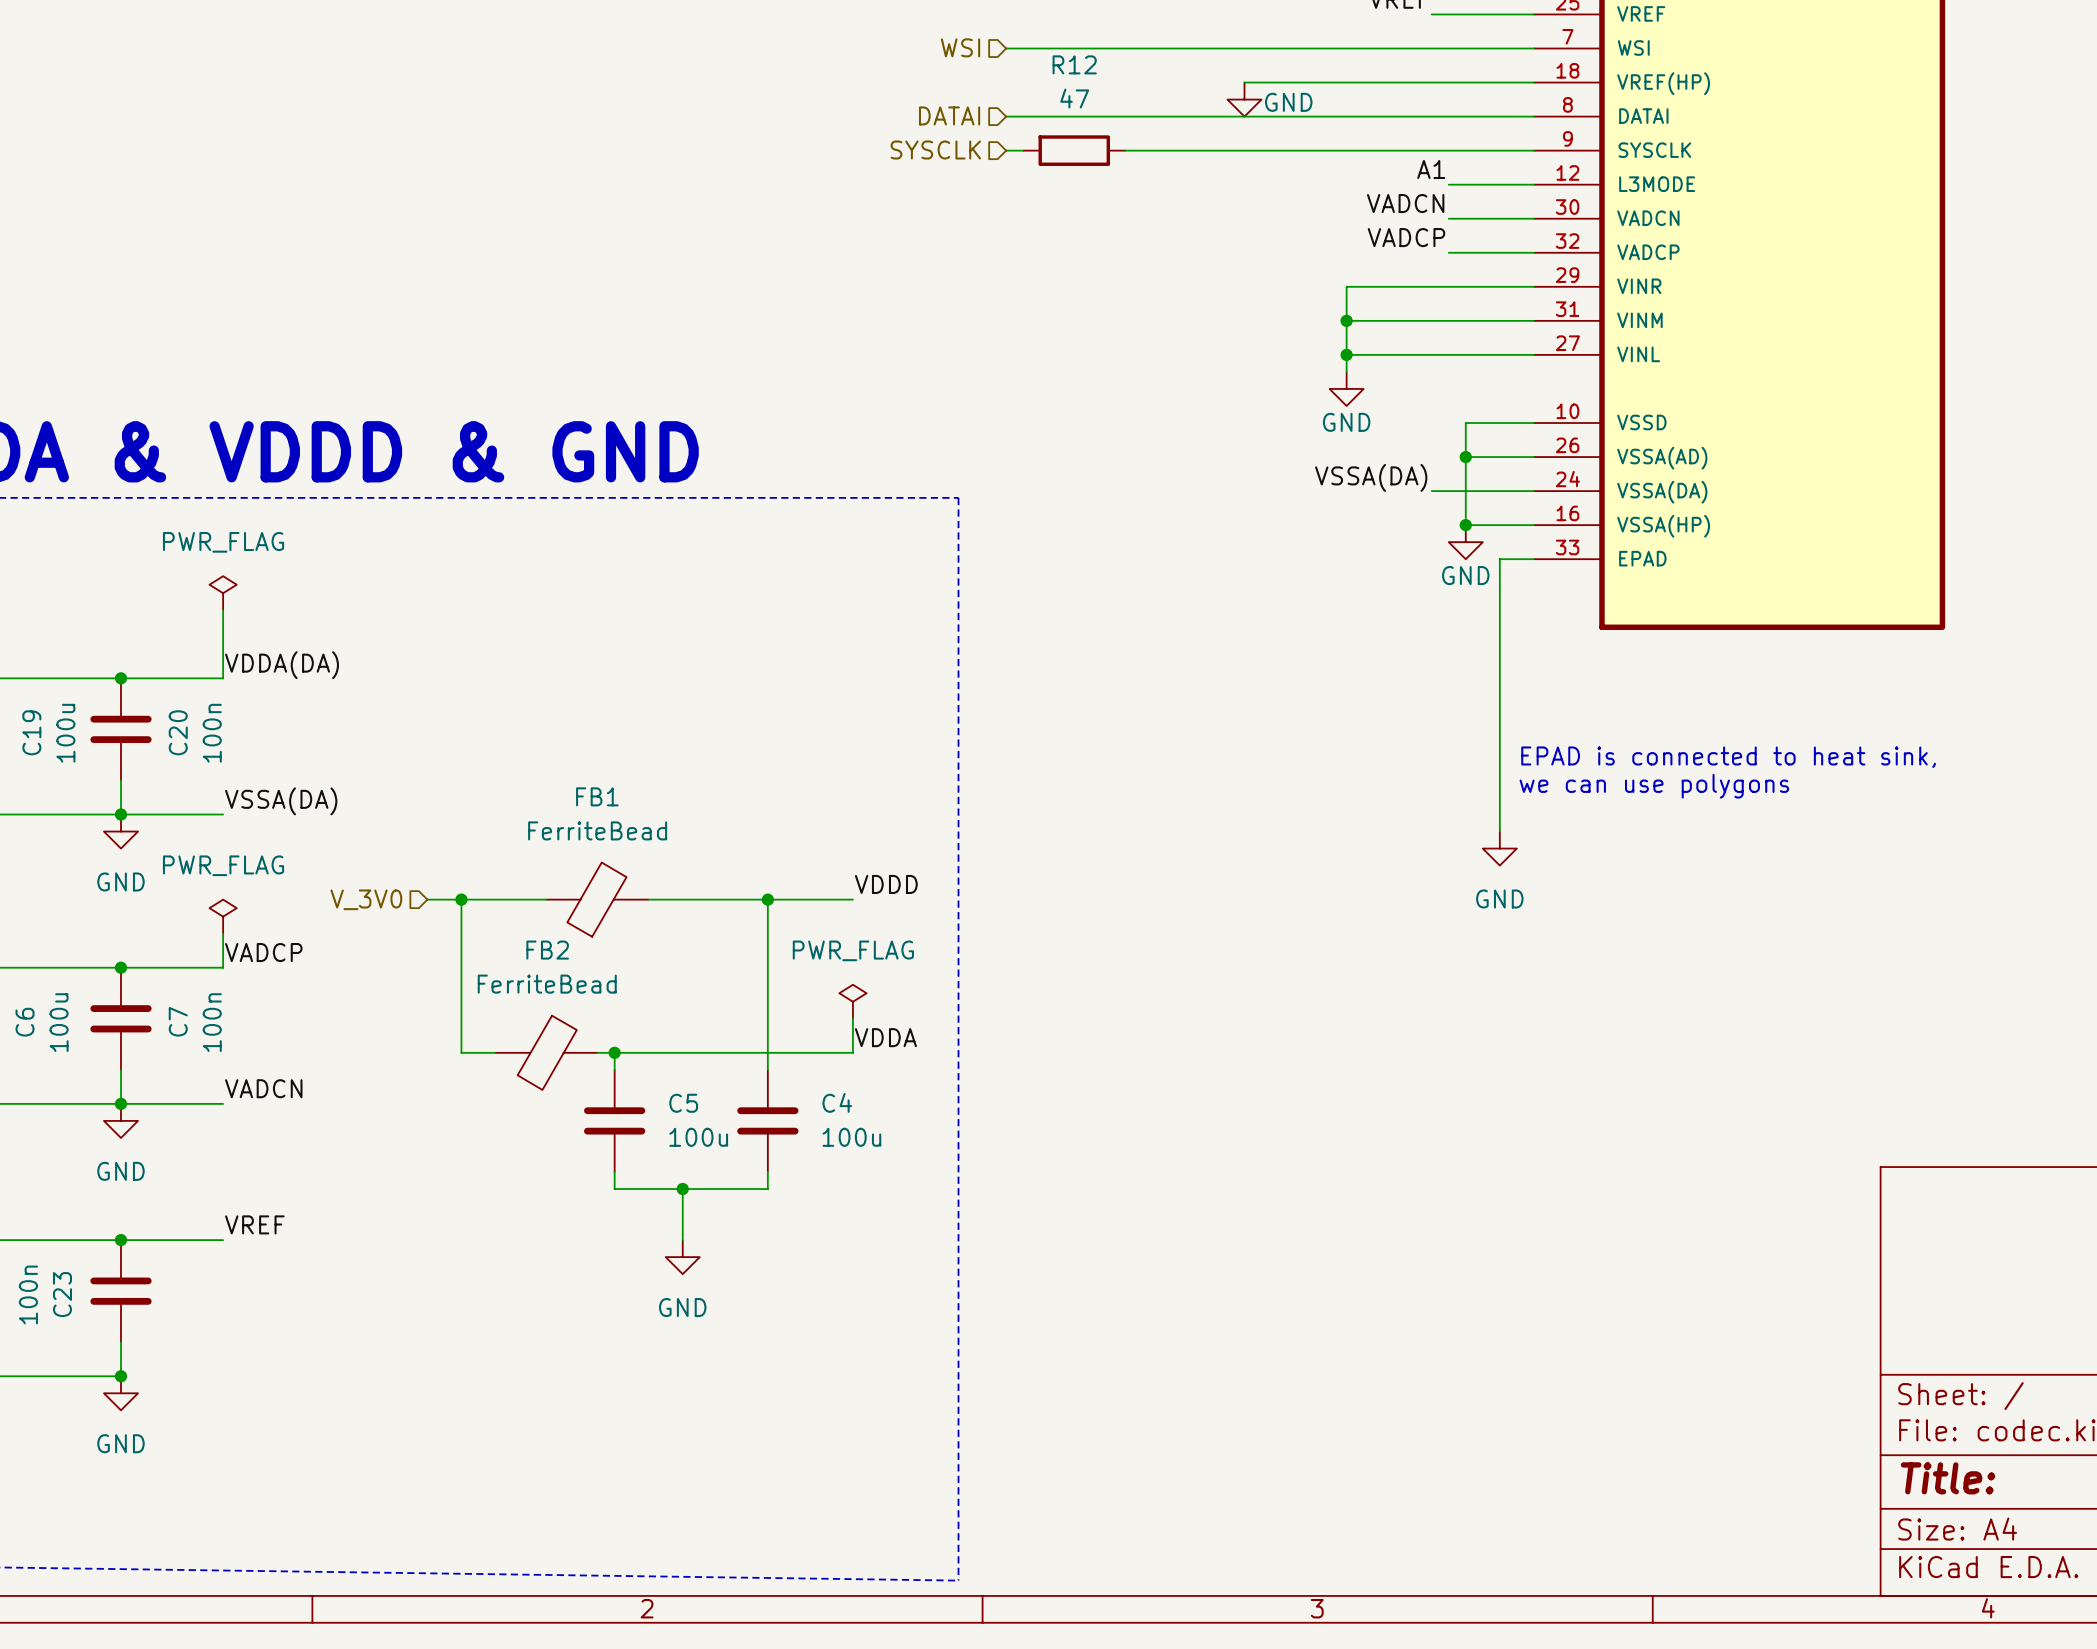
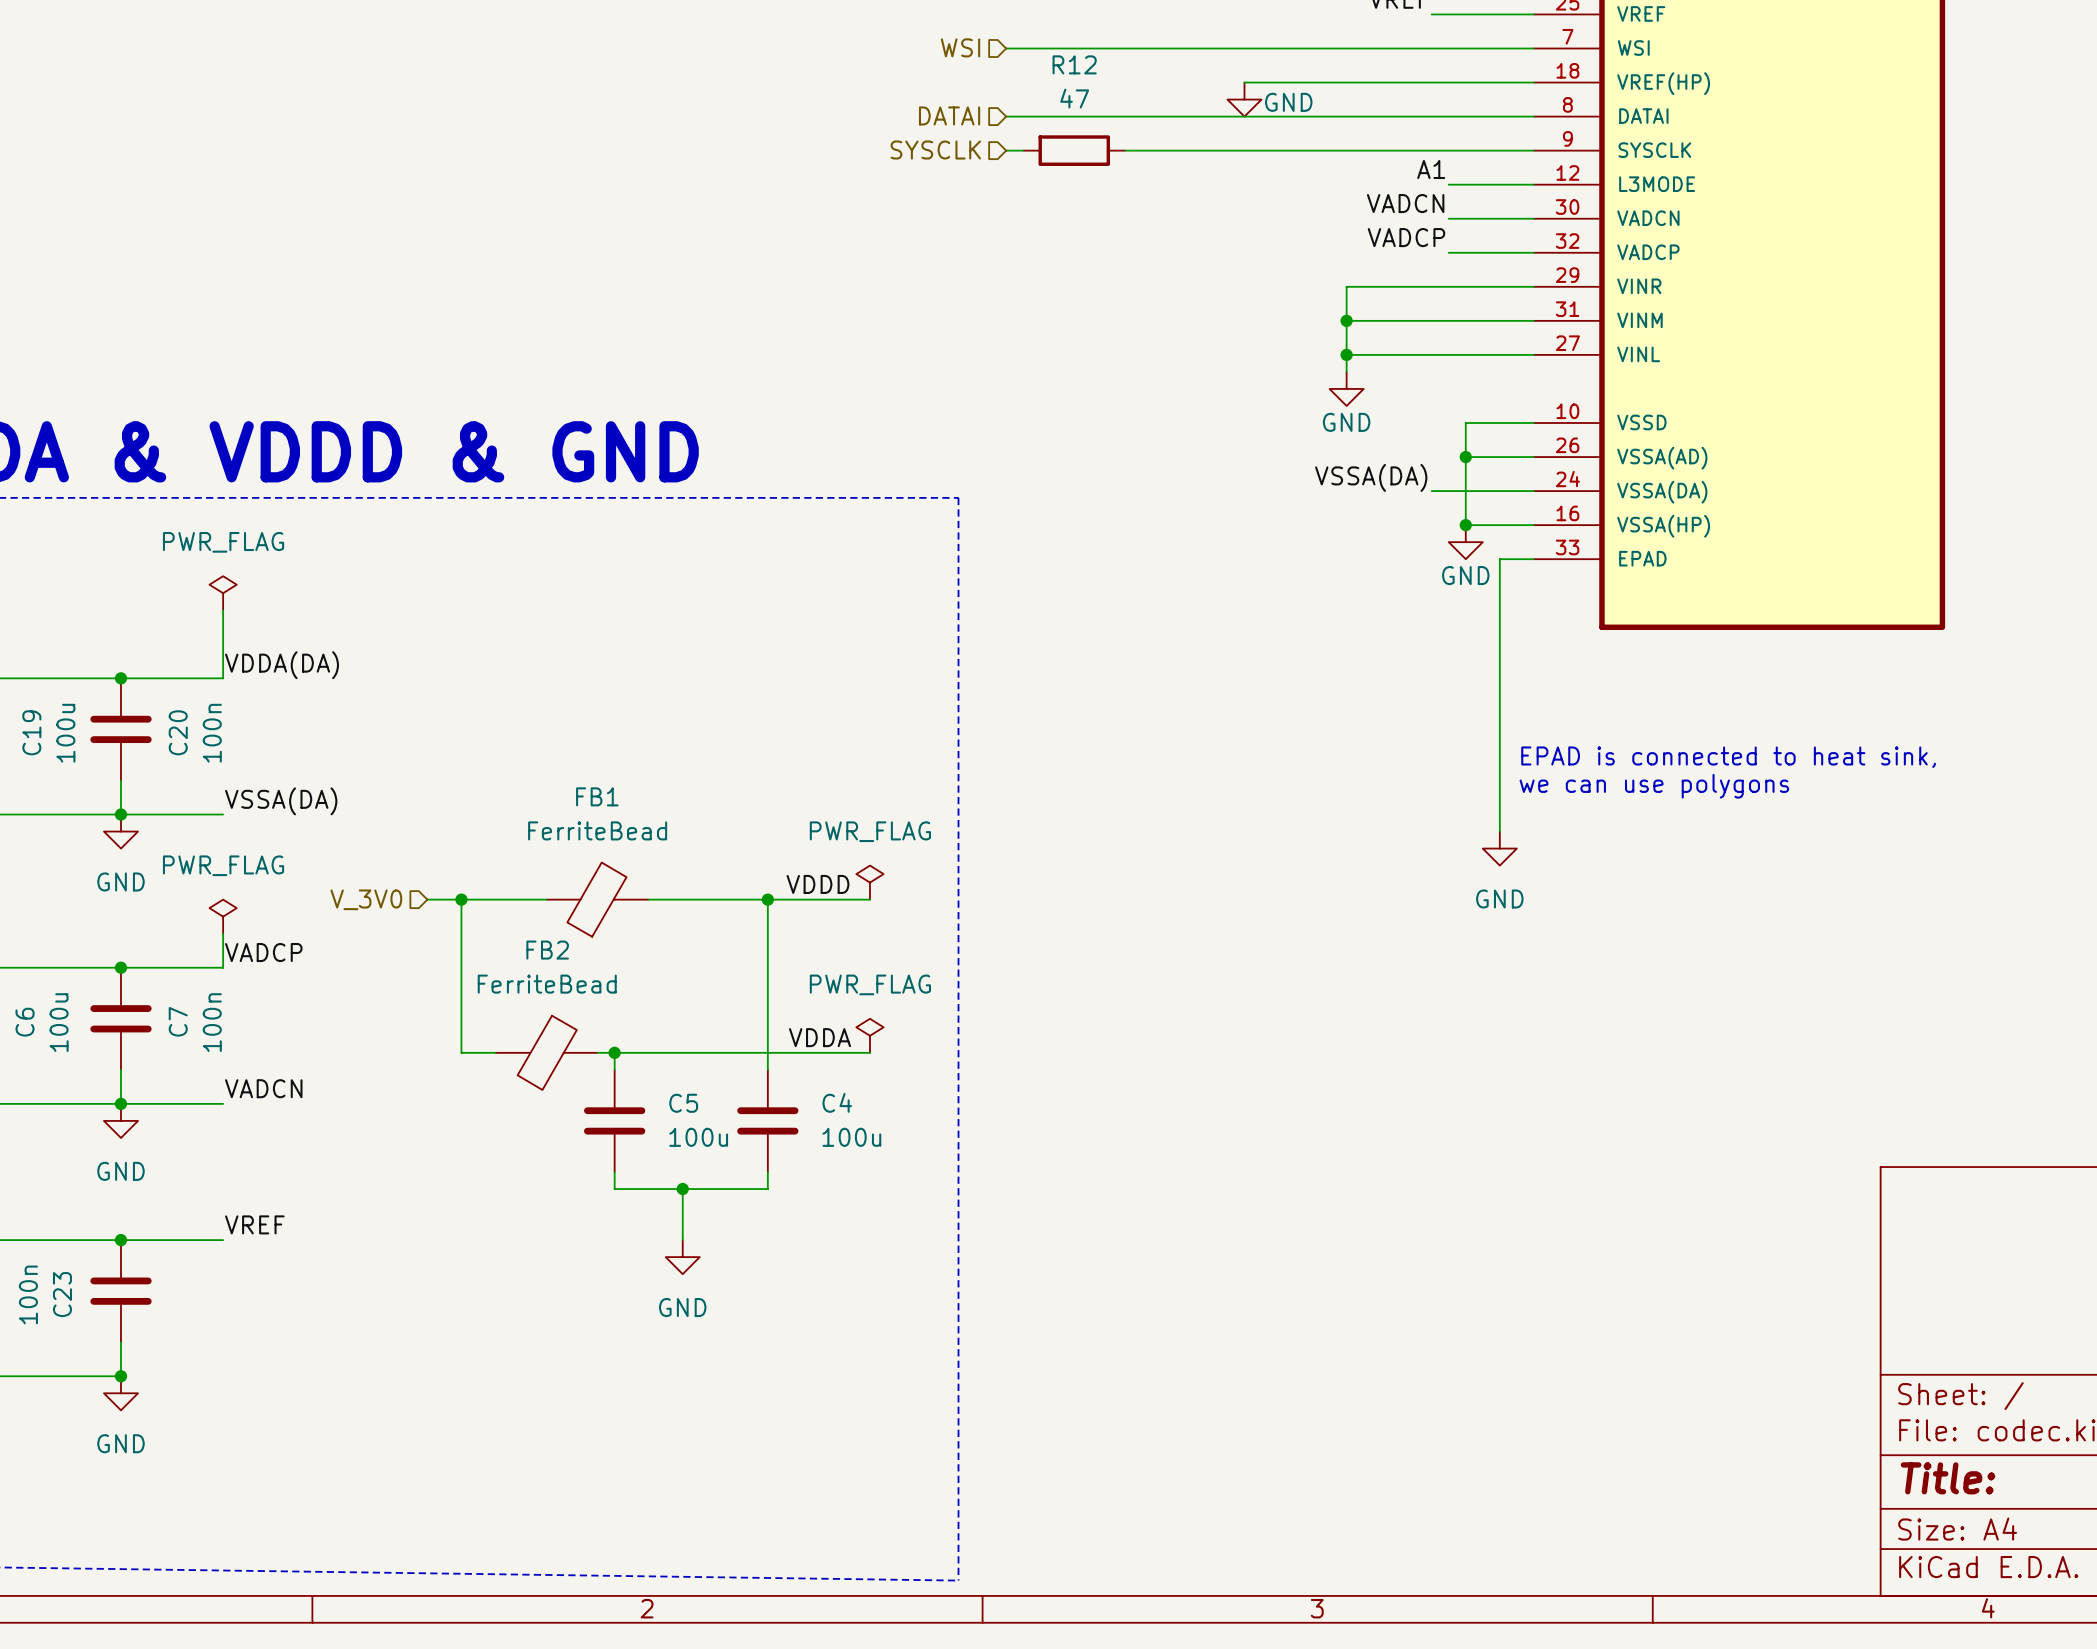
power symbol: none -> PWR_FLAG (869, 882)
label position: VDDD (886, 884) -> VDDD (817, 884)
wire: none -> (852, 899) (869, 899)
power symbol position: PWR_FLAG (852, 1001) -> PWR_FLAG (869, 1035)
wire: (852, 1018) (852, 1052) -> (869, 1052) (852, 1052)
label position: VDDA (885, 1037) -> VDDA (820, 1037)

